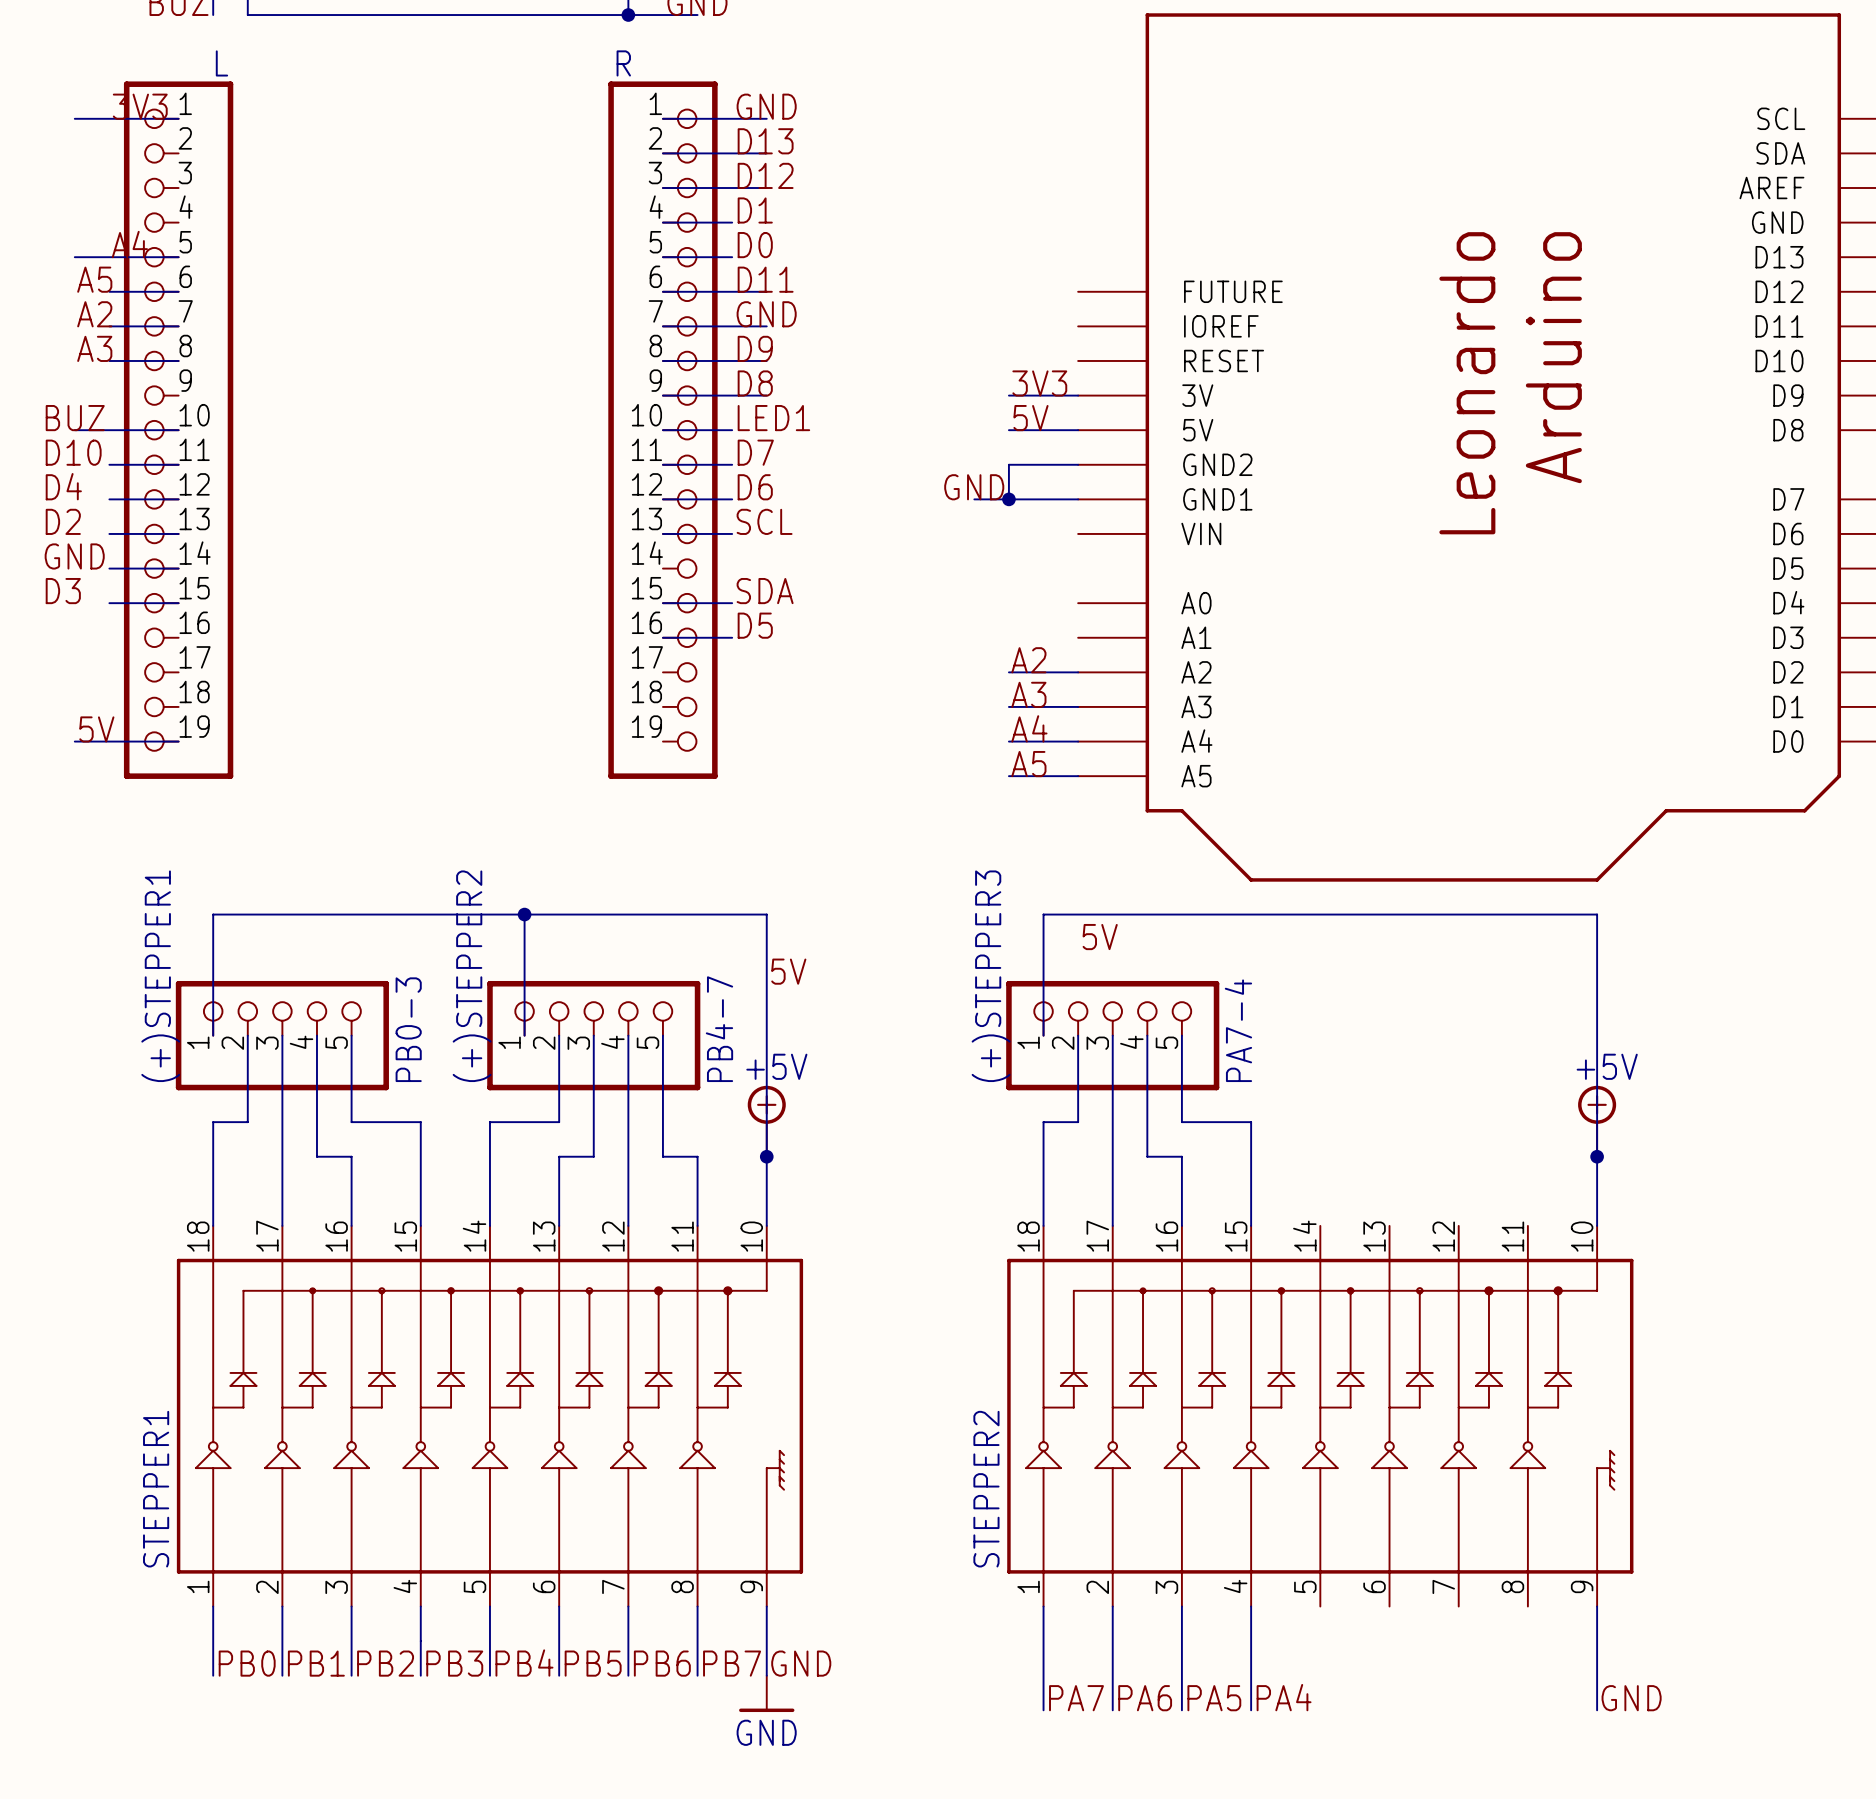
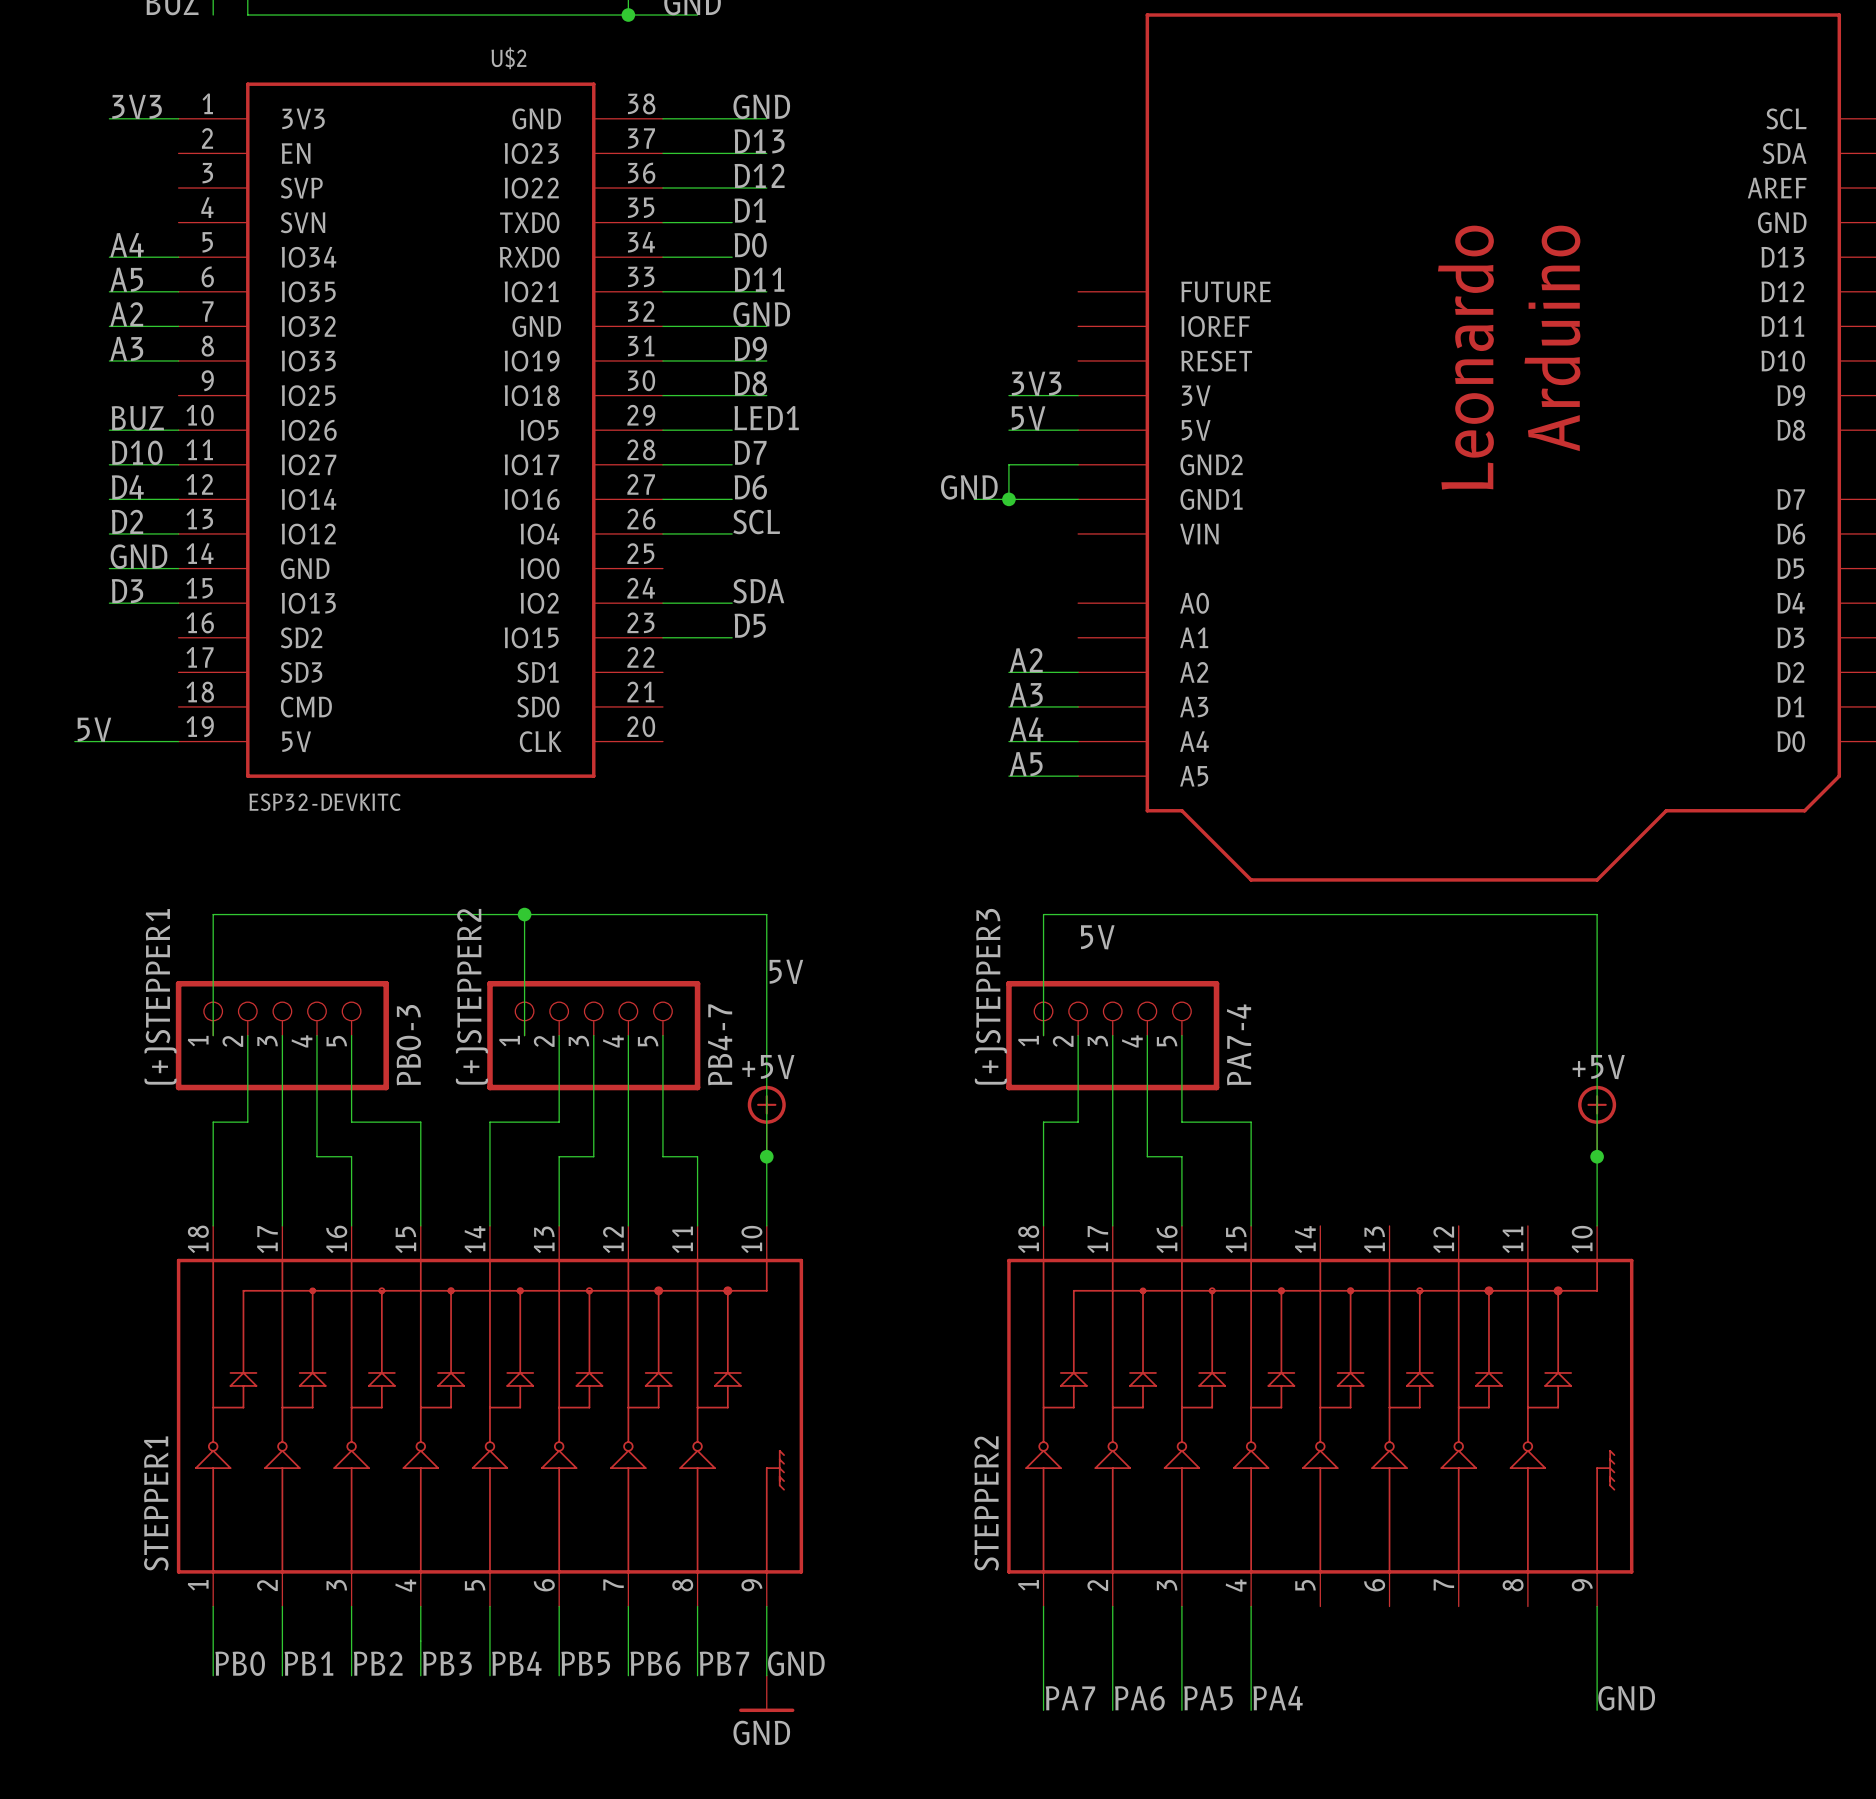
wire: (74, 118) (109, 118) -> none
wire: (74, 257) (109, 257) -> none
label position: A5 (94, 279) -> A5 (126, 279)
label position: A2 (94, 314) -> A2 (126, 314)
label position: A3 (94, 348) -> A3 (126, 348)
label position: BUZ (75, 418) -> BUZ (137, 418)
wire: (74, 430) (109, 430) -> none
L: (178, 430) -> none
U$2: none -> (420, 430)
R: (662, 430) -> none
label position: D10 (73, 452) -> D10 (137, 452)
label position: D4 (63, 486) -> D4 (127, 487)
label position: D2 (63, 521) -> D2 (127, 521)
label position: GND (74, 556) -> GND (139, 556)
label position: D3 (63, 591) -> D3 (127, 591)

